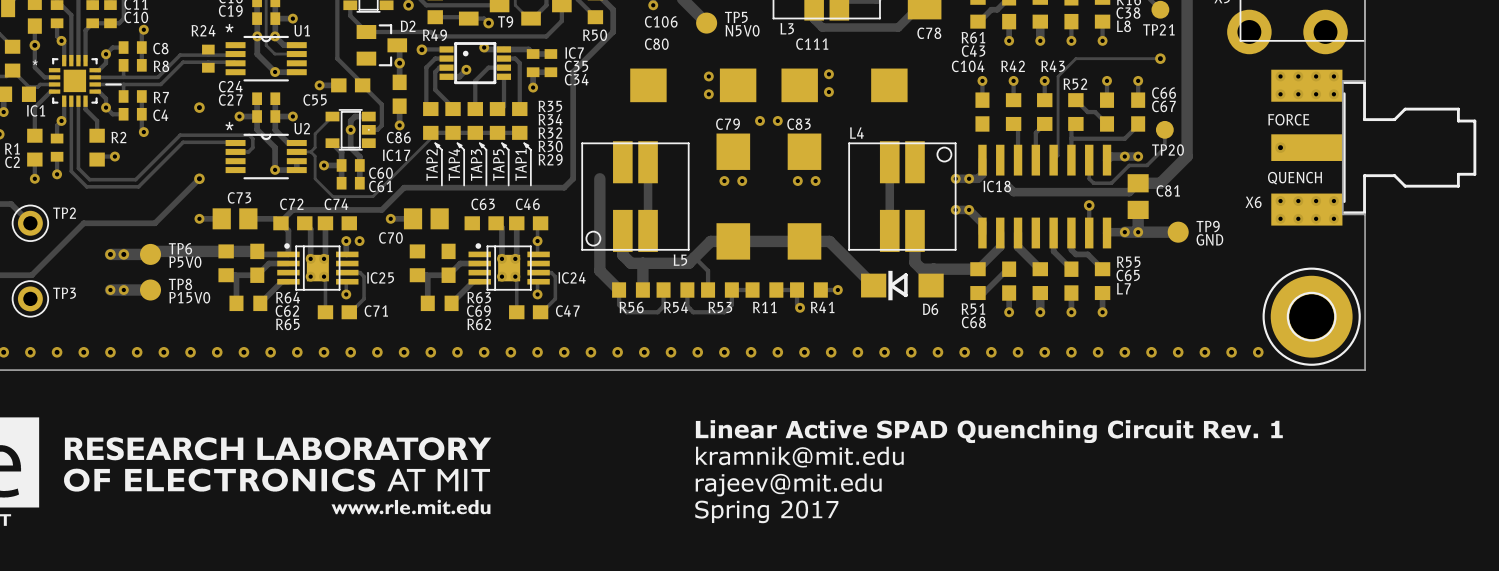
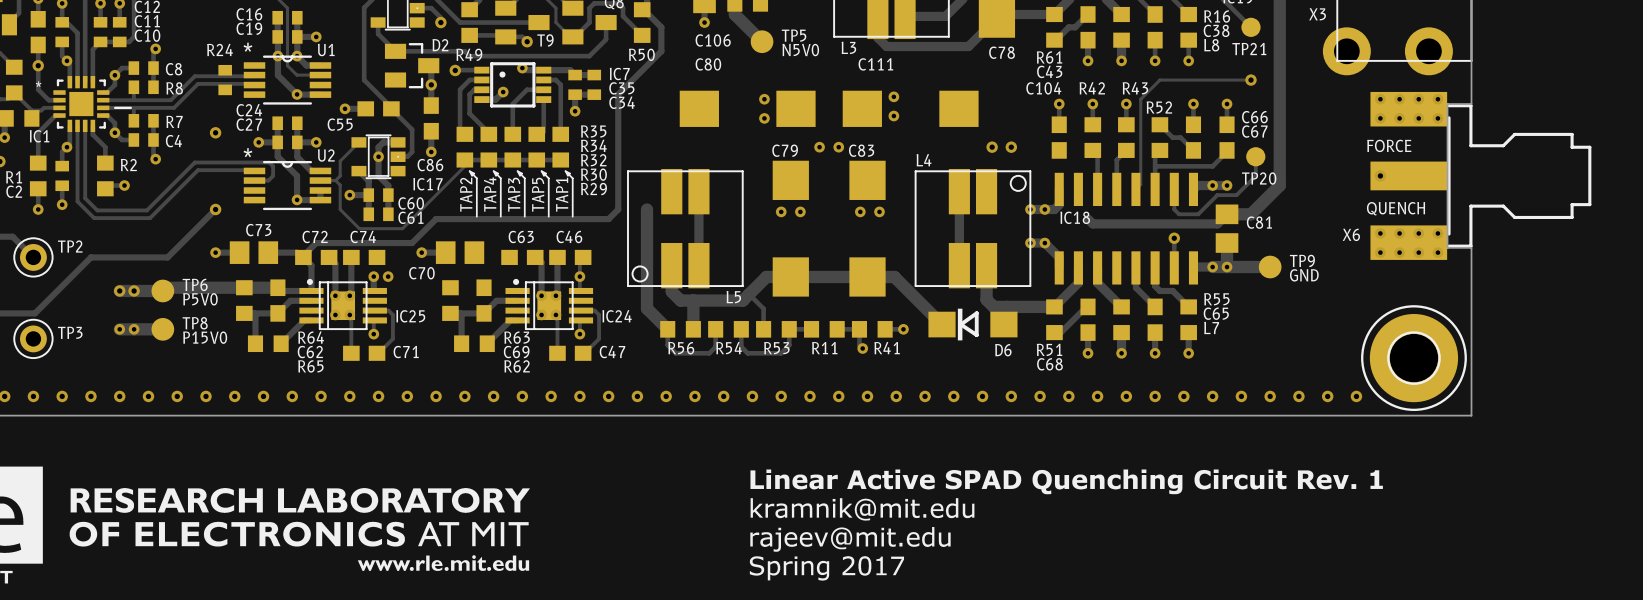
via: none -> (992, 147)
via: none -> (1011, 147)

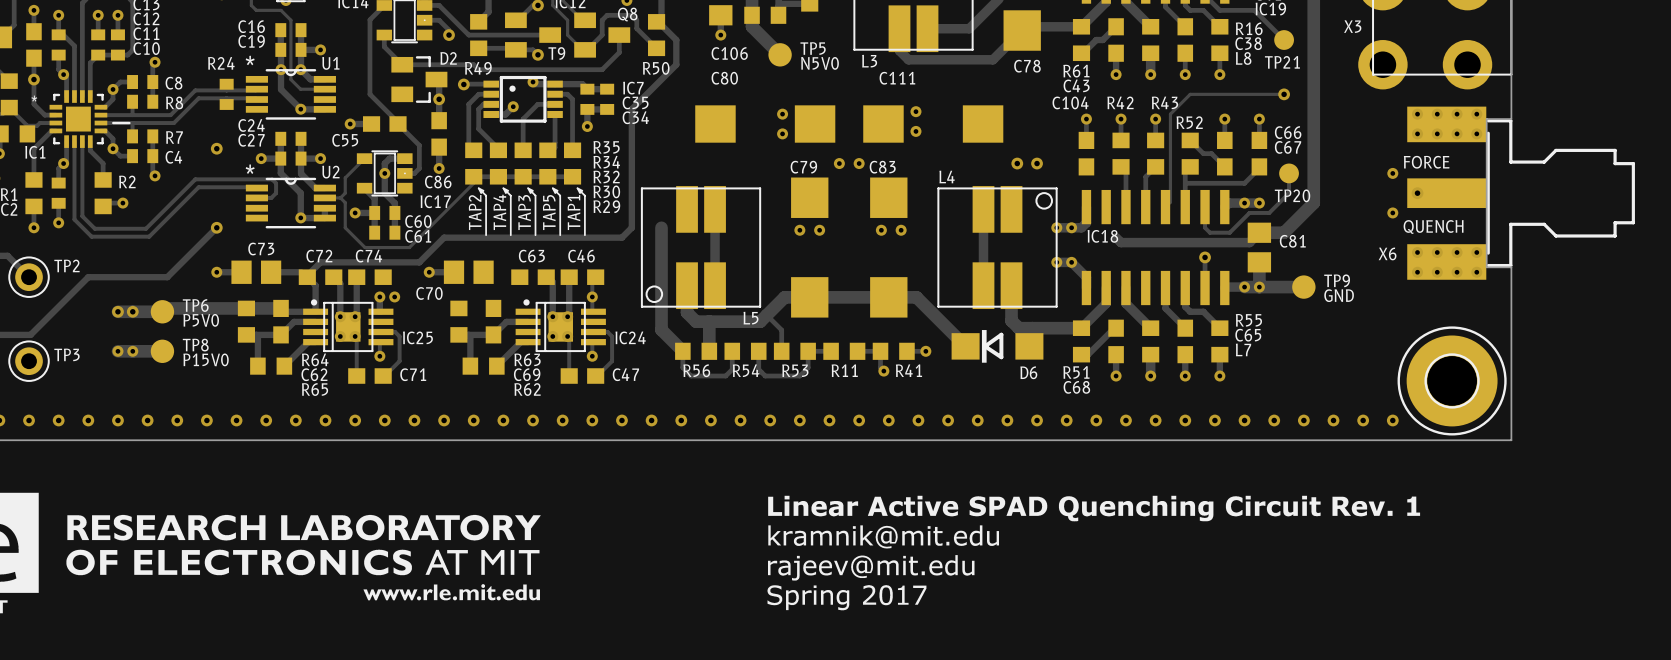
via: none -> (1392, 173)
via: none -> (1392, 212)

